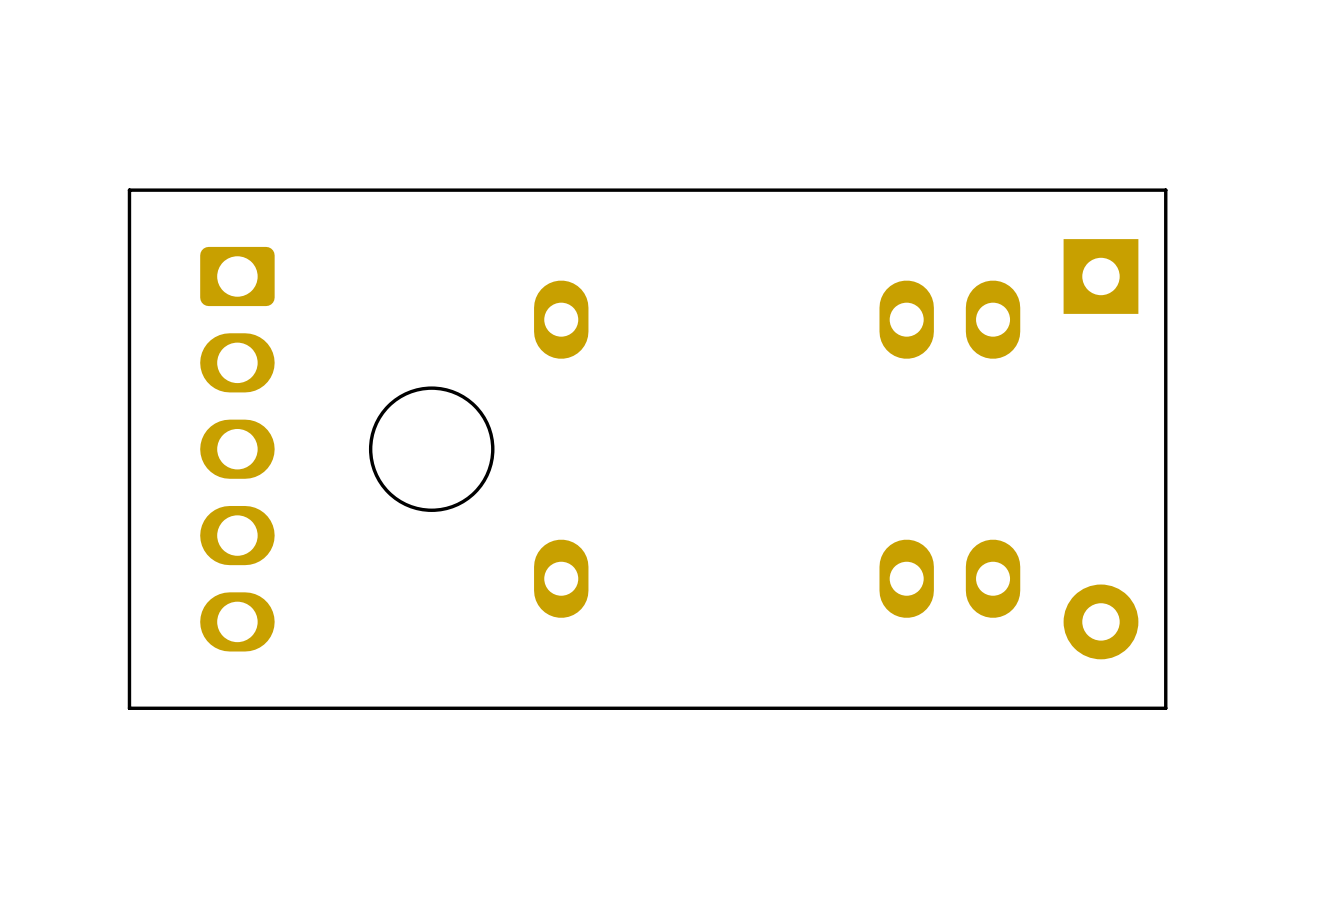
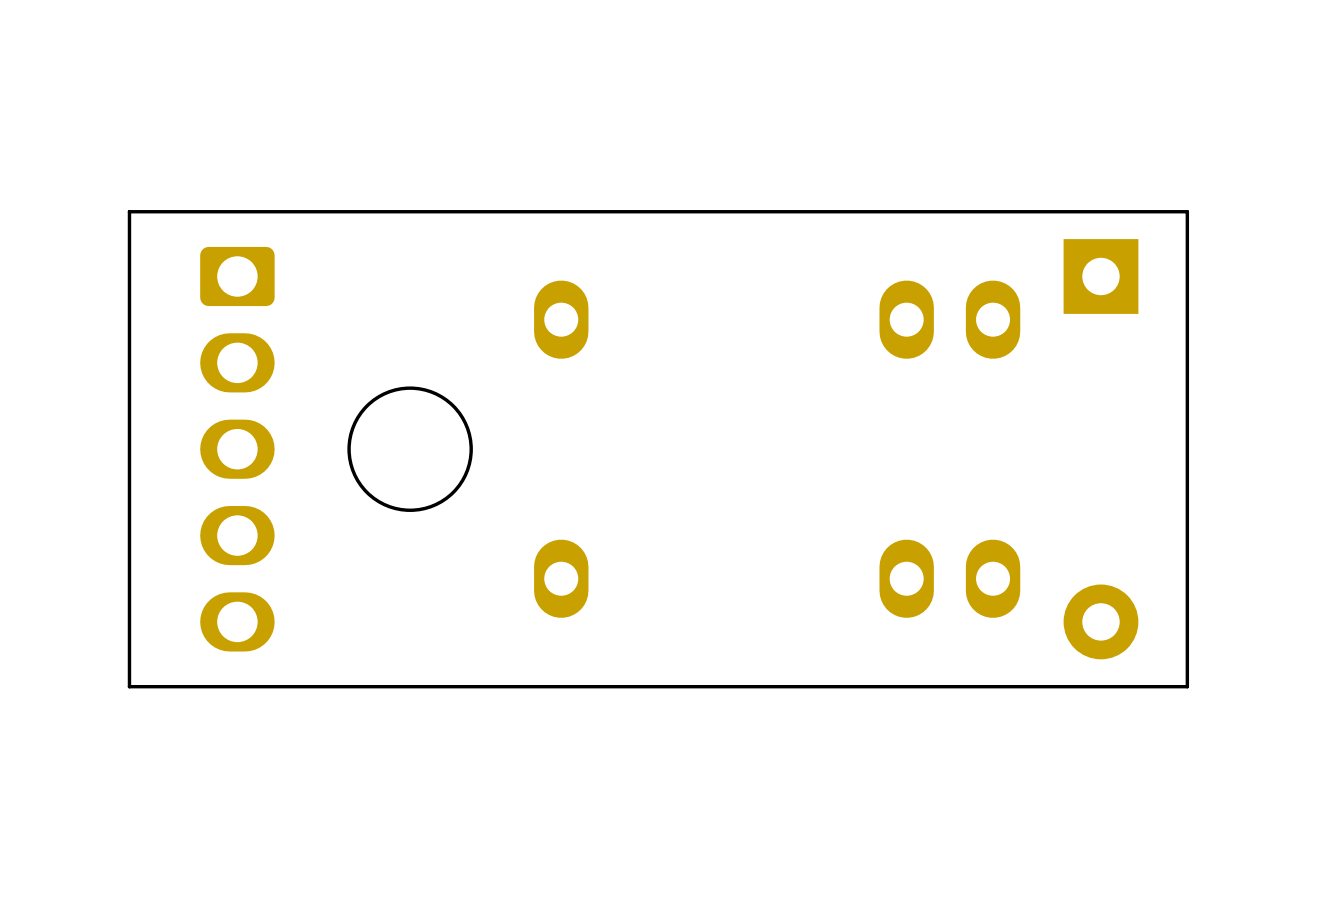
board edge: (129, 211) (129, 190) (1165, 190) (1165, 708) (129, 708) (129, 686) -> (129, 211) (1187, 211) (1187, 686) (129, 686)
round board edge position: (431, 449) -> (410, 449)

